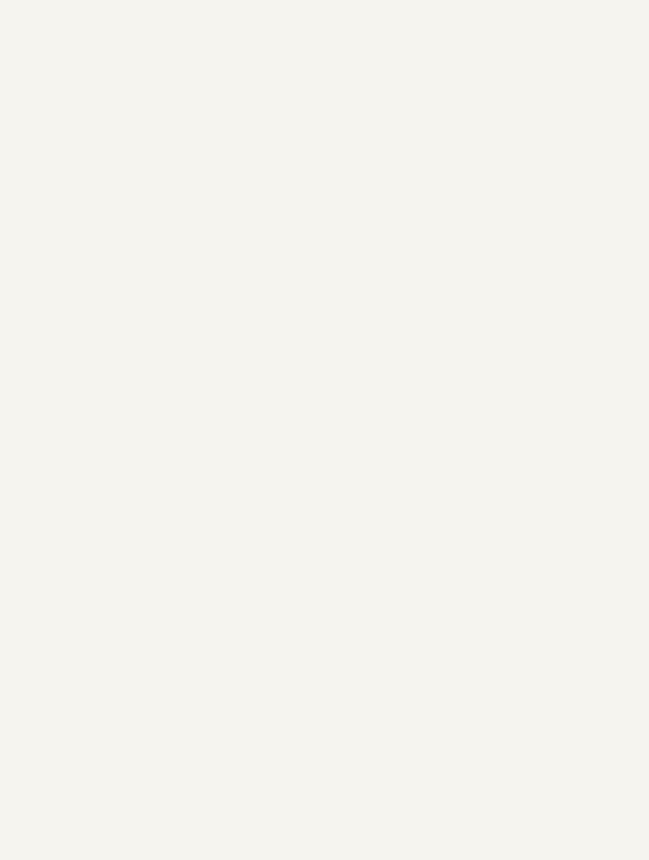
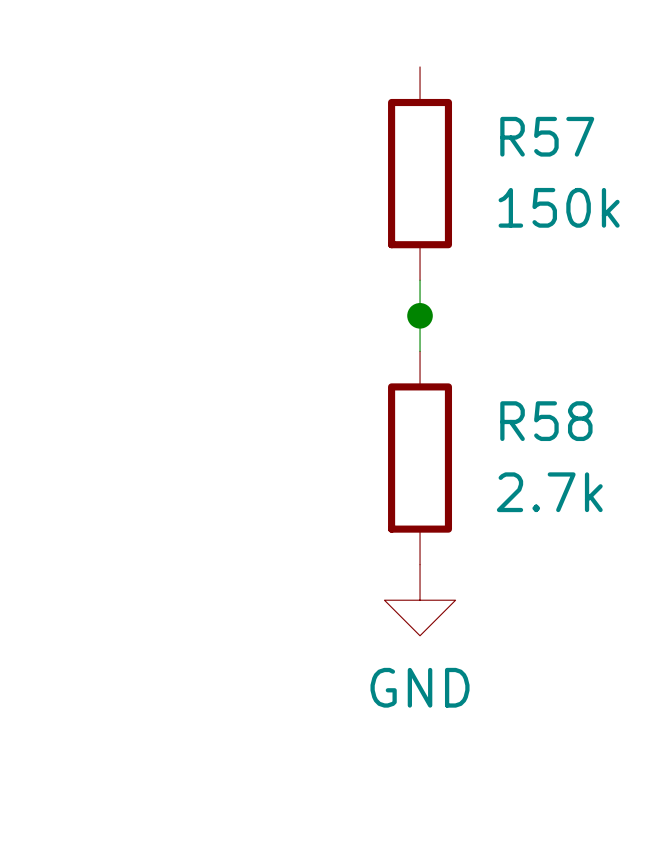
R57: none -> 150k (420, 173)
wire: none -> (420, 280) (420, 351)
junction: none -> (420, 315)
R58: none -> 2.7k (420, 458)
power symbol: none -> GND (420, 600)

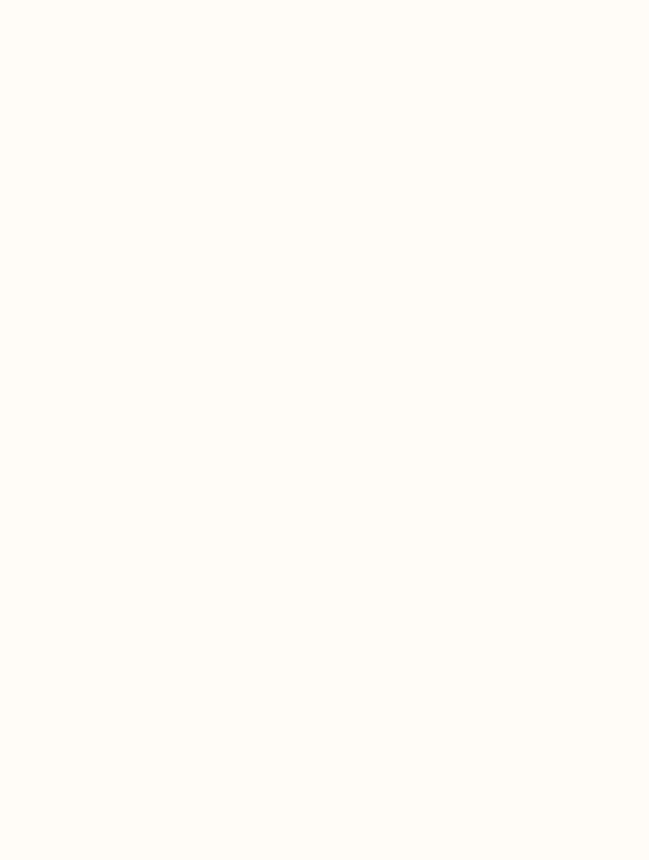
R57: 150k (420, 173) -> none
wire: (420, 280) (420, 351) -> none
junction: (420, 315) -> none
R58: 2.7k (420, 458) -> none
power symbol: GND (420, 600) -> none

